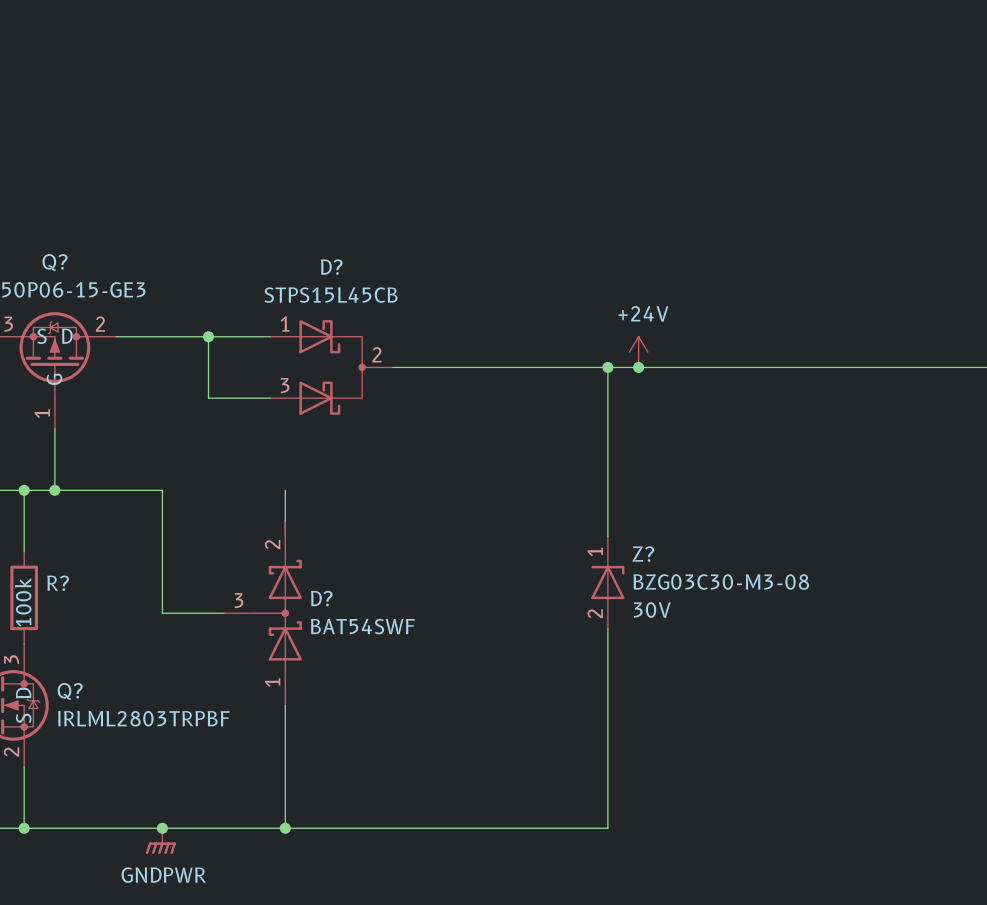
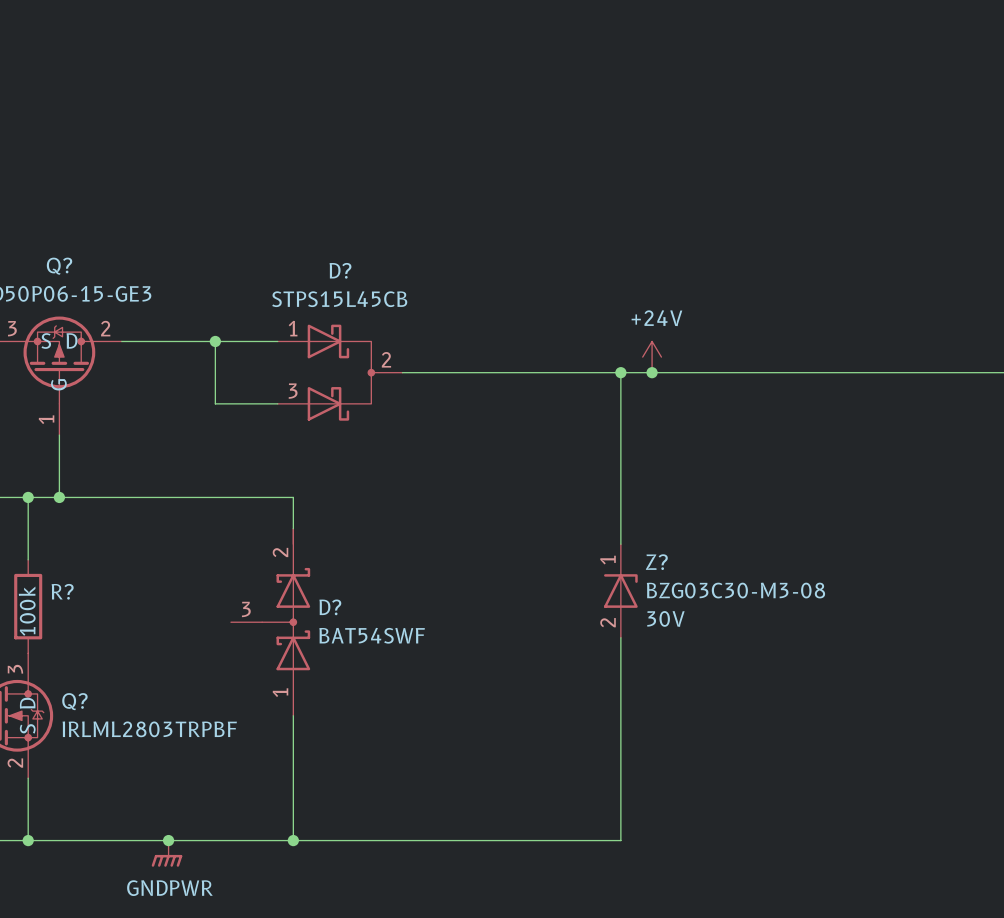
wire: (162, 490) (162, 613) (223, 613) -> (168, 497) (293, 497)

